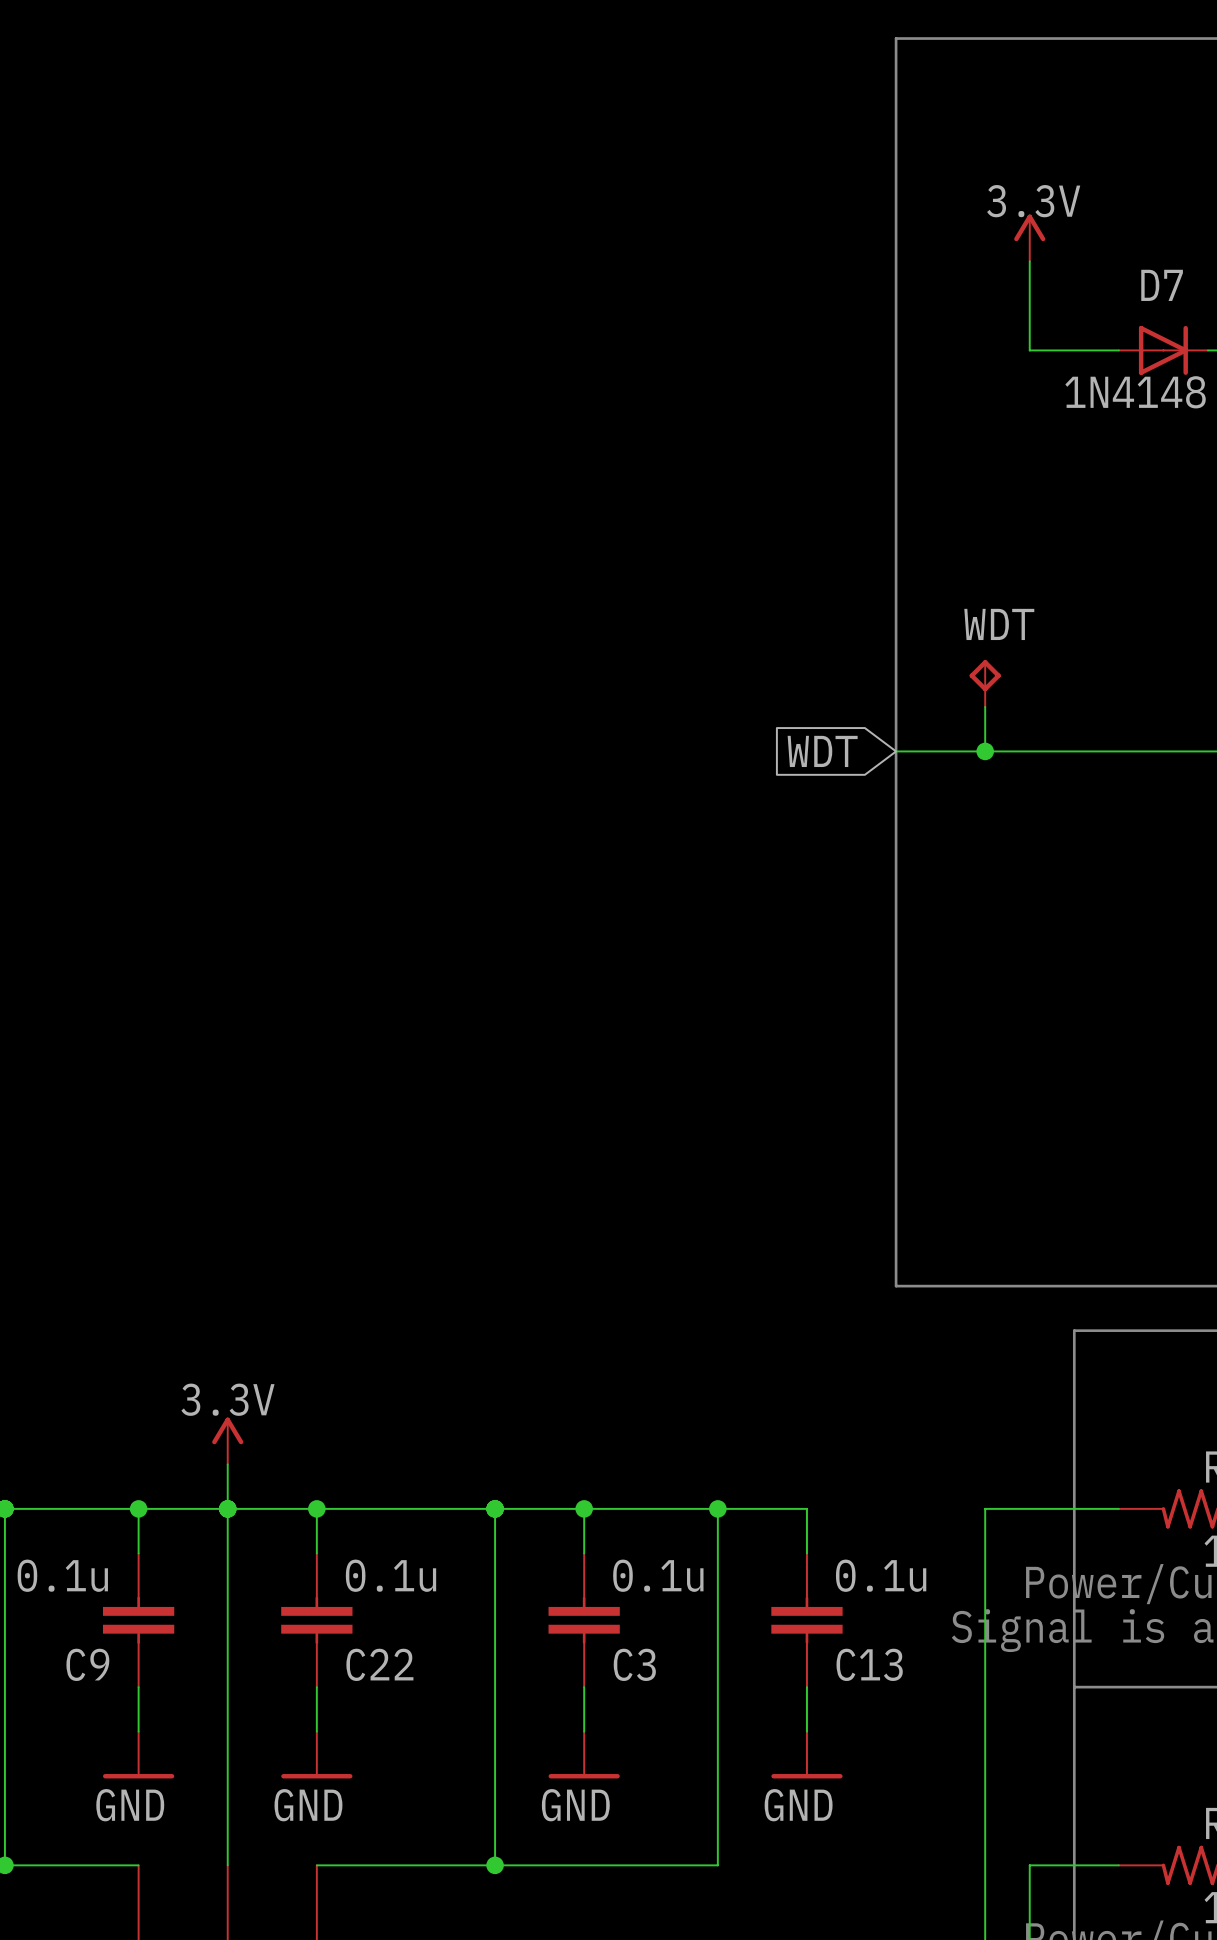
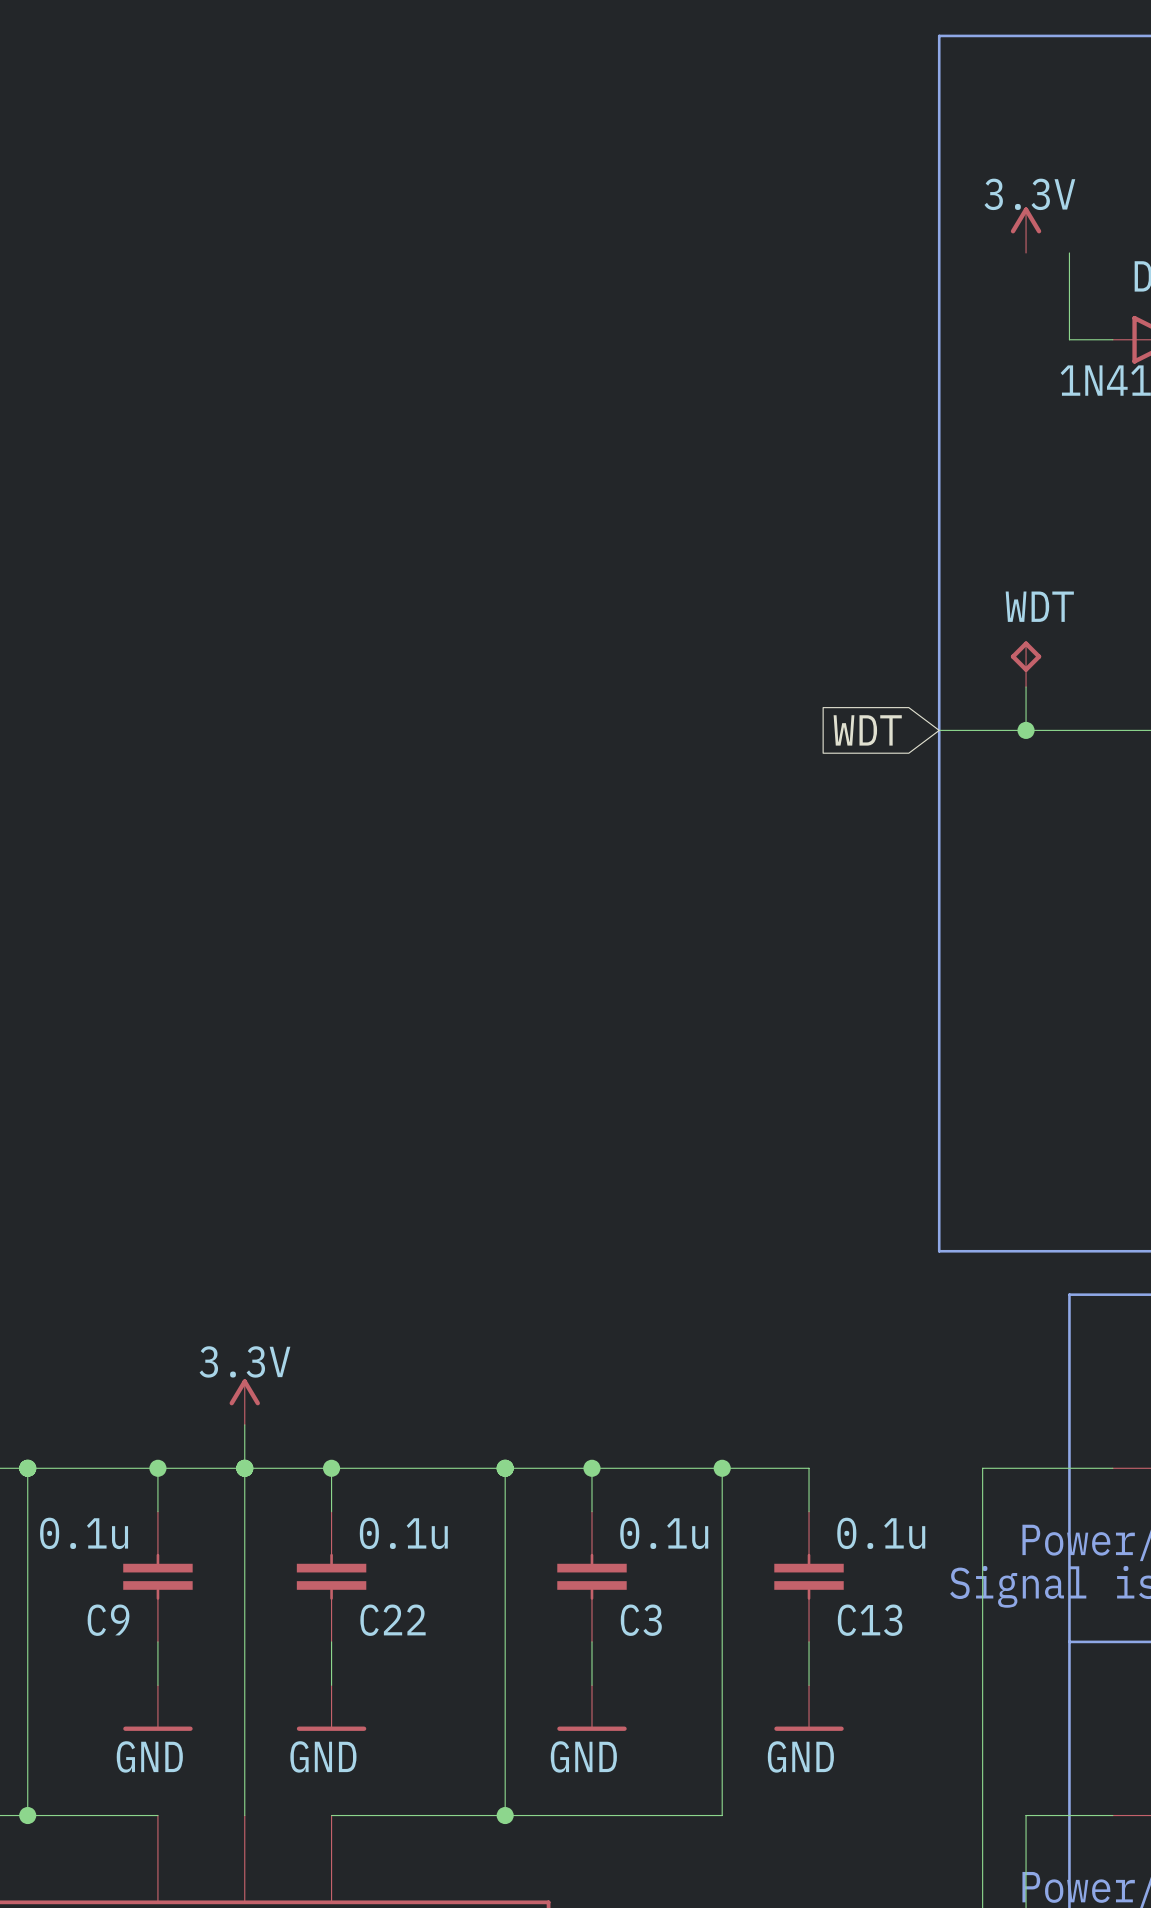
line: (940, 38) (896, 38) (896, 1286) (940, 1286) -> (939, 35) (939, 1251)
wire: (1029, 261) (1029, 350) (1074, 350) -> (1069, 252) (1069, 339)
WDT position: (985, 683) -> (1026, 664)
wire: (985, 706) (985, 751) -> (1026, 687) (1026, 730)
global label position: WDT (822, 751) -> WDT (867, 730)
wire: (896, 751) (940, 751) -> none
junction position: (985, 751) -> (1026, 730)

